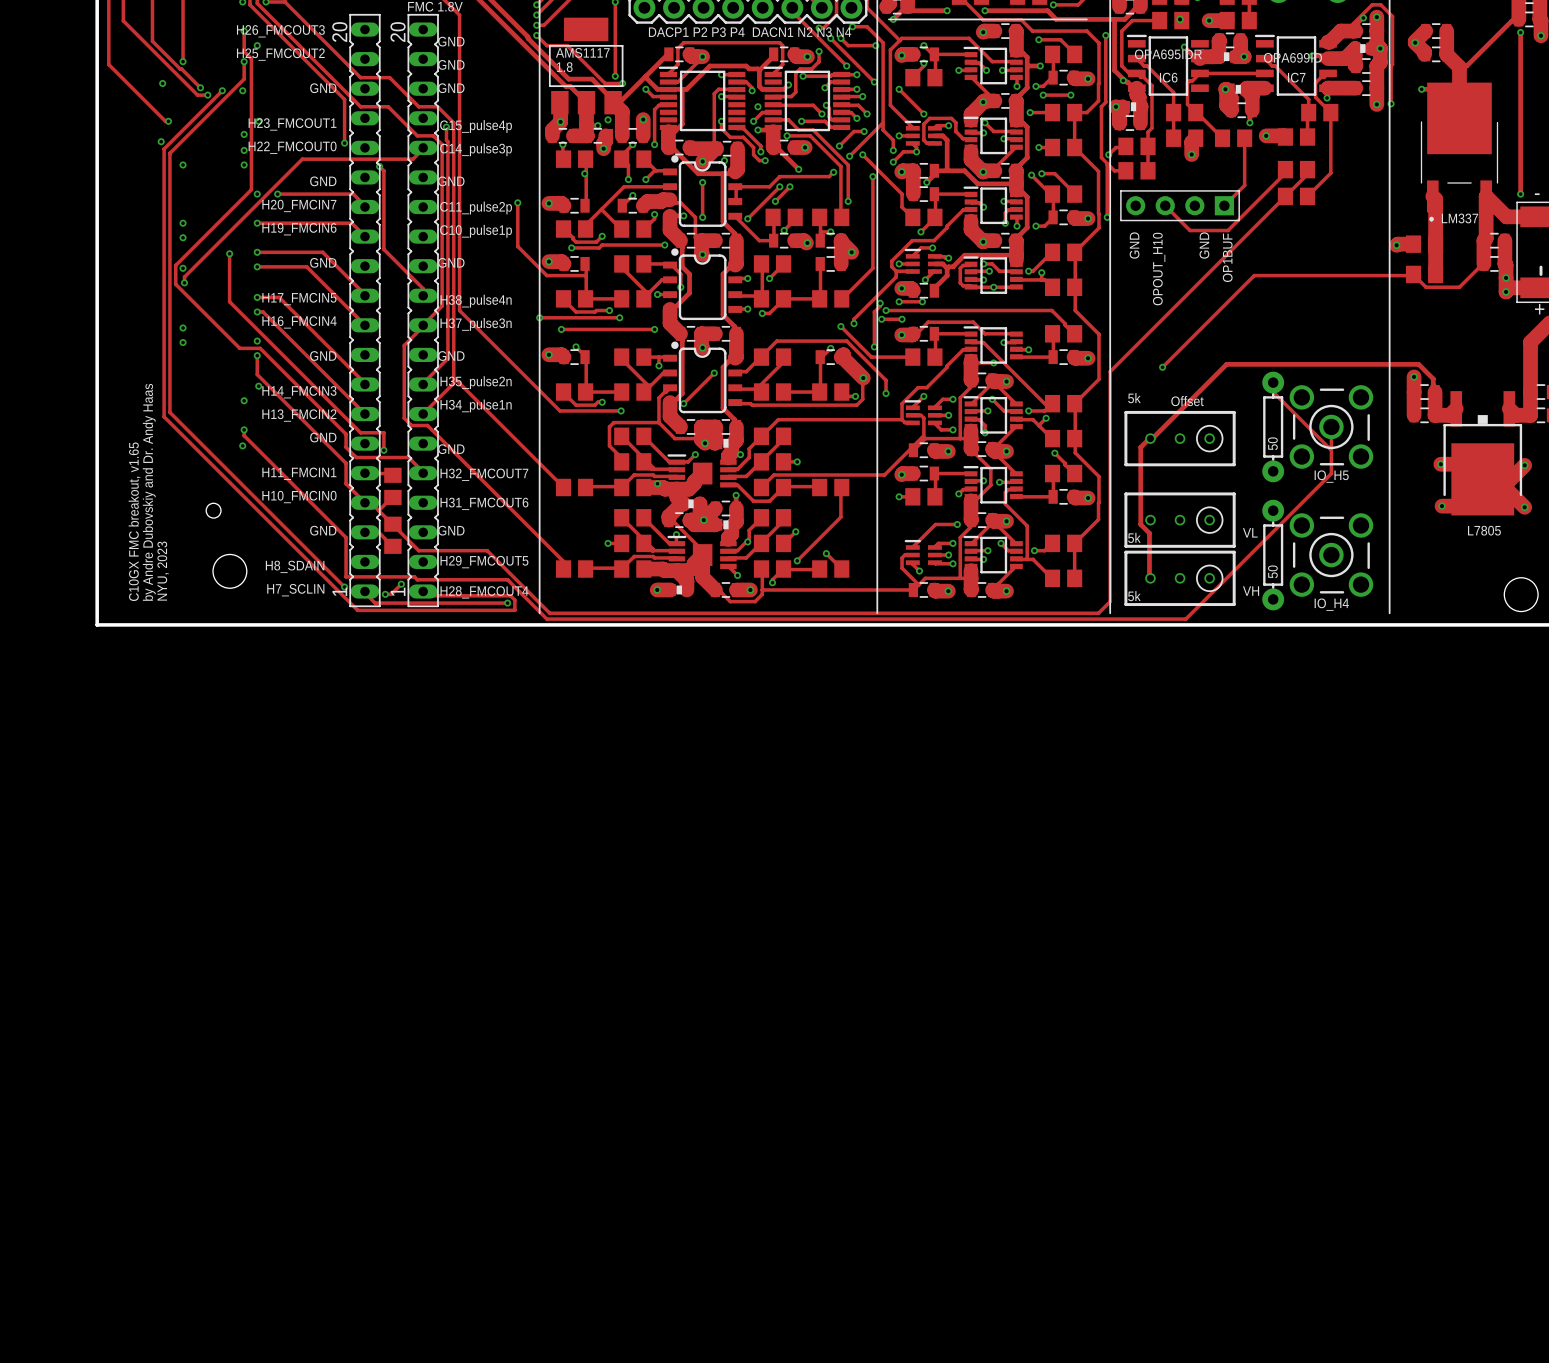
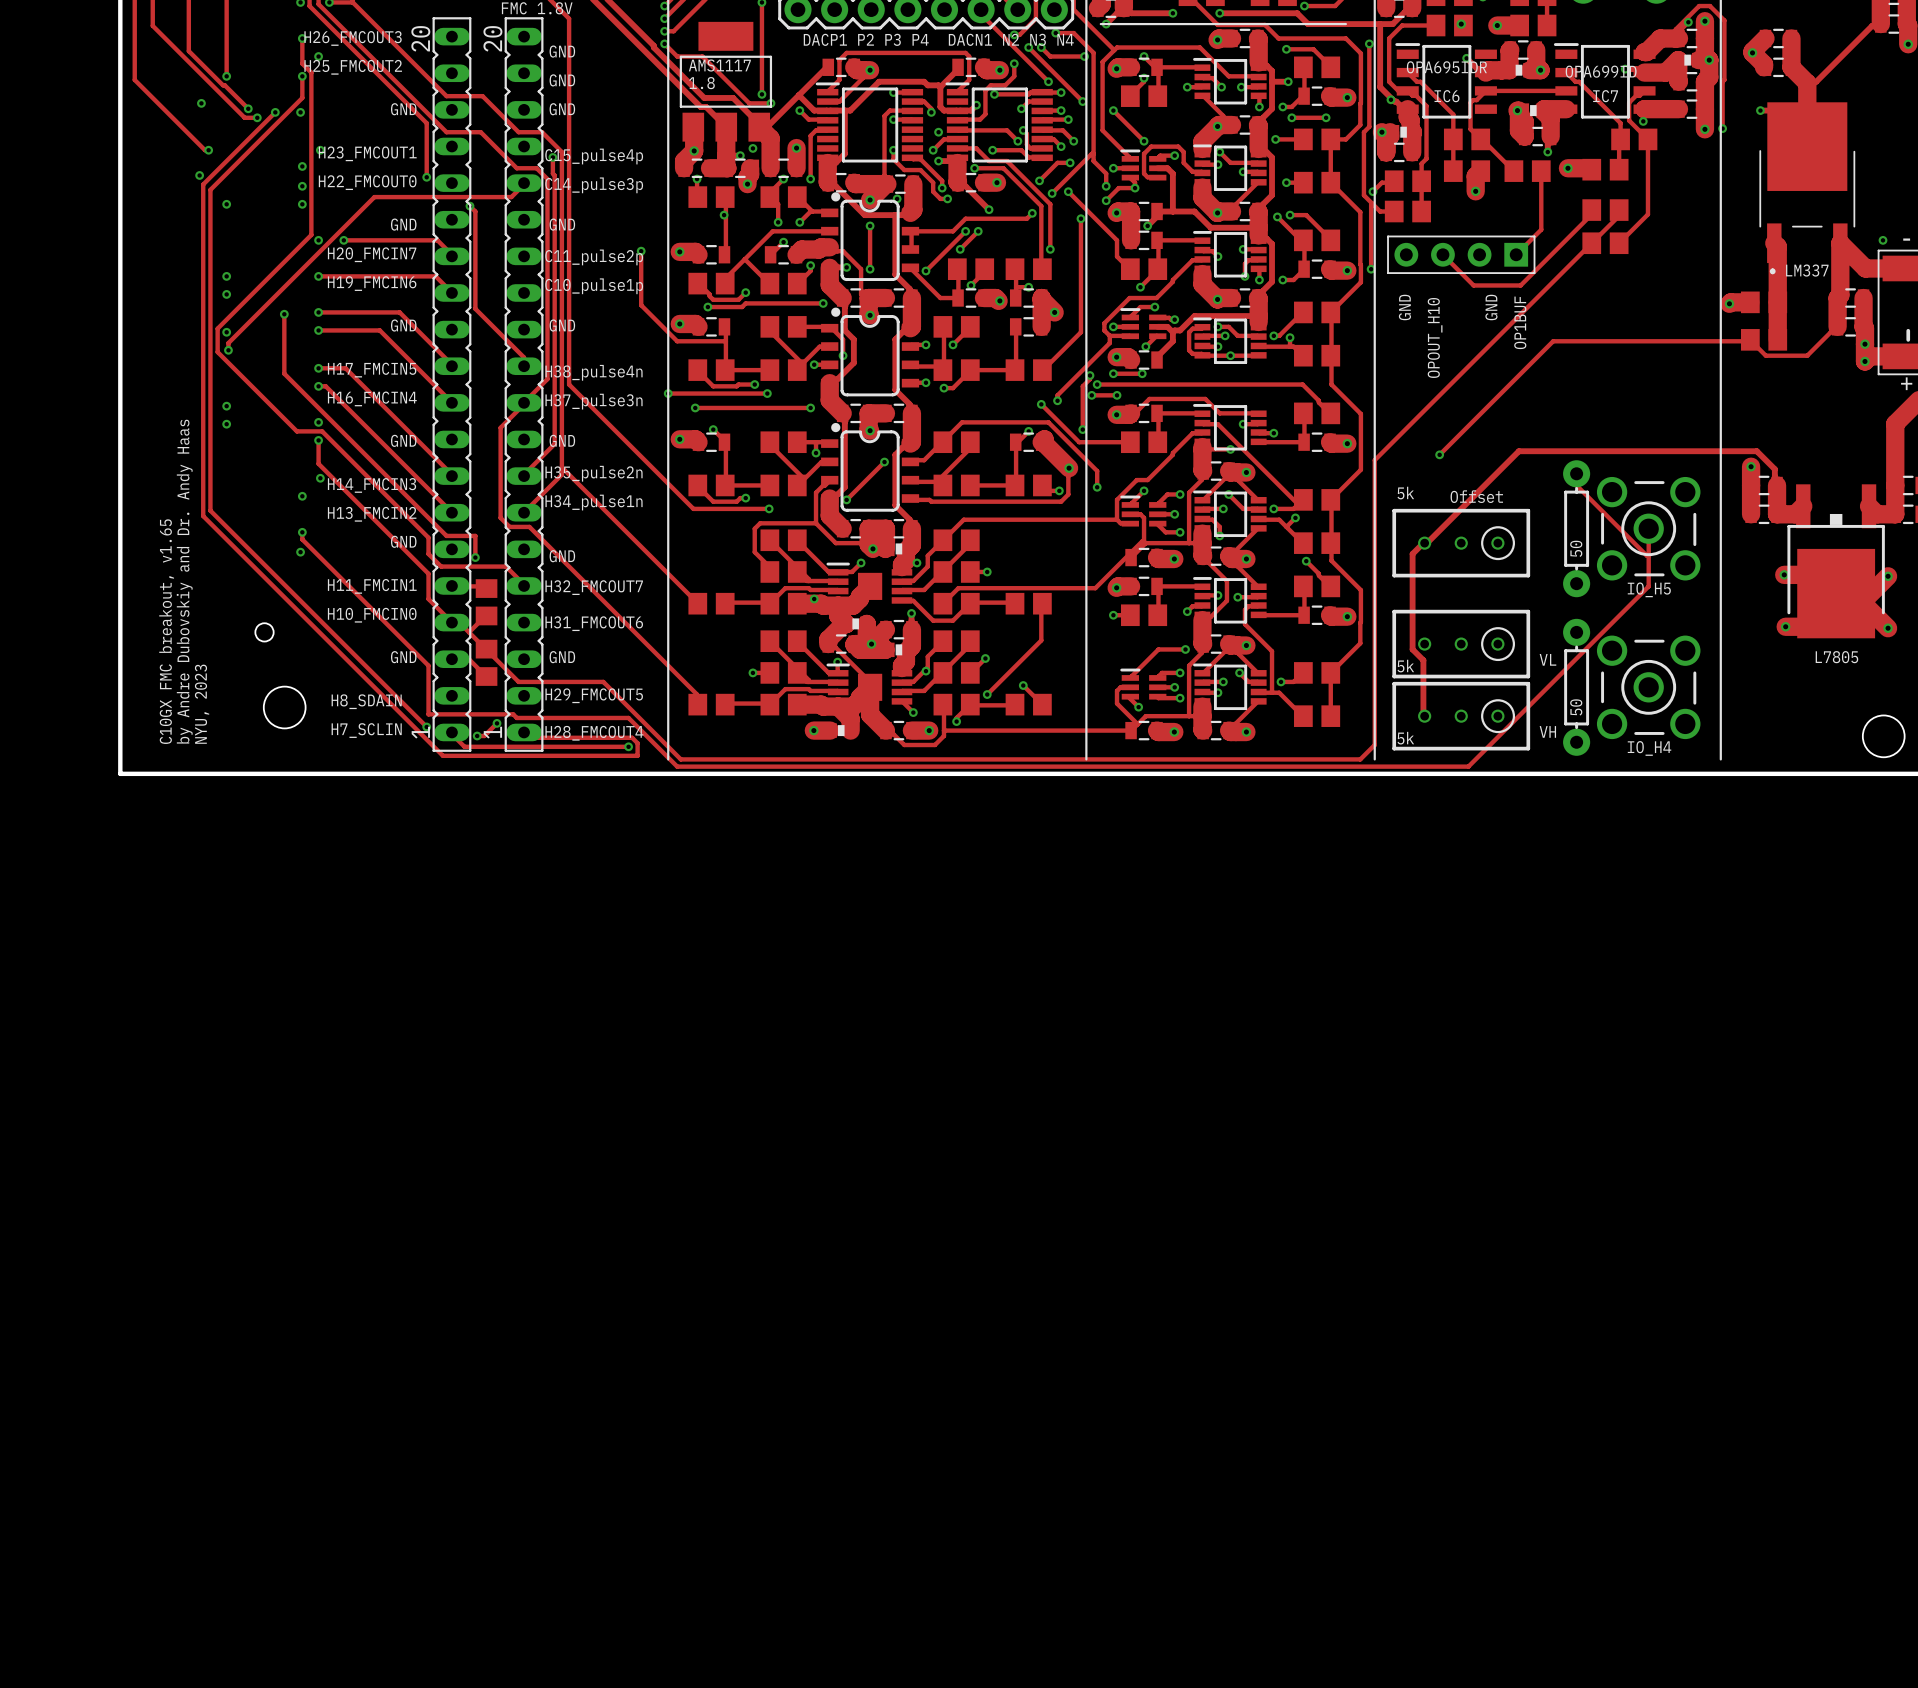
track: (1520, 32) (1520, 194) -> none
via: (1520, 32) -> none

